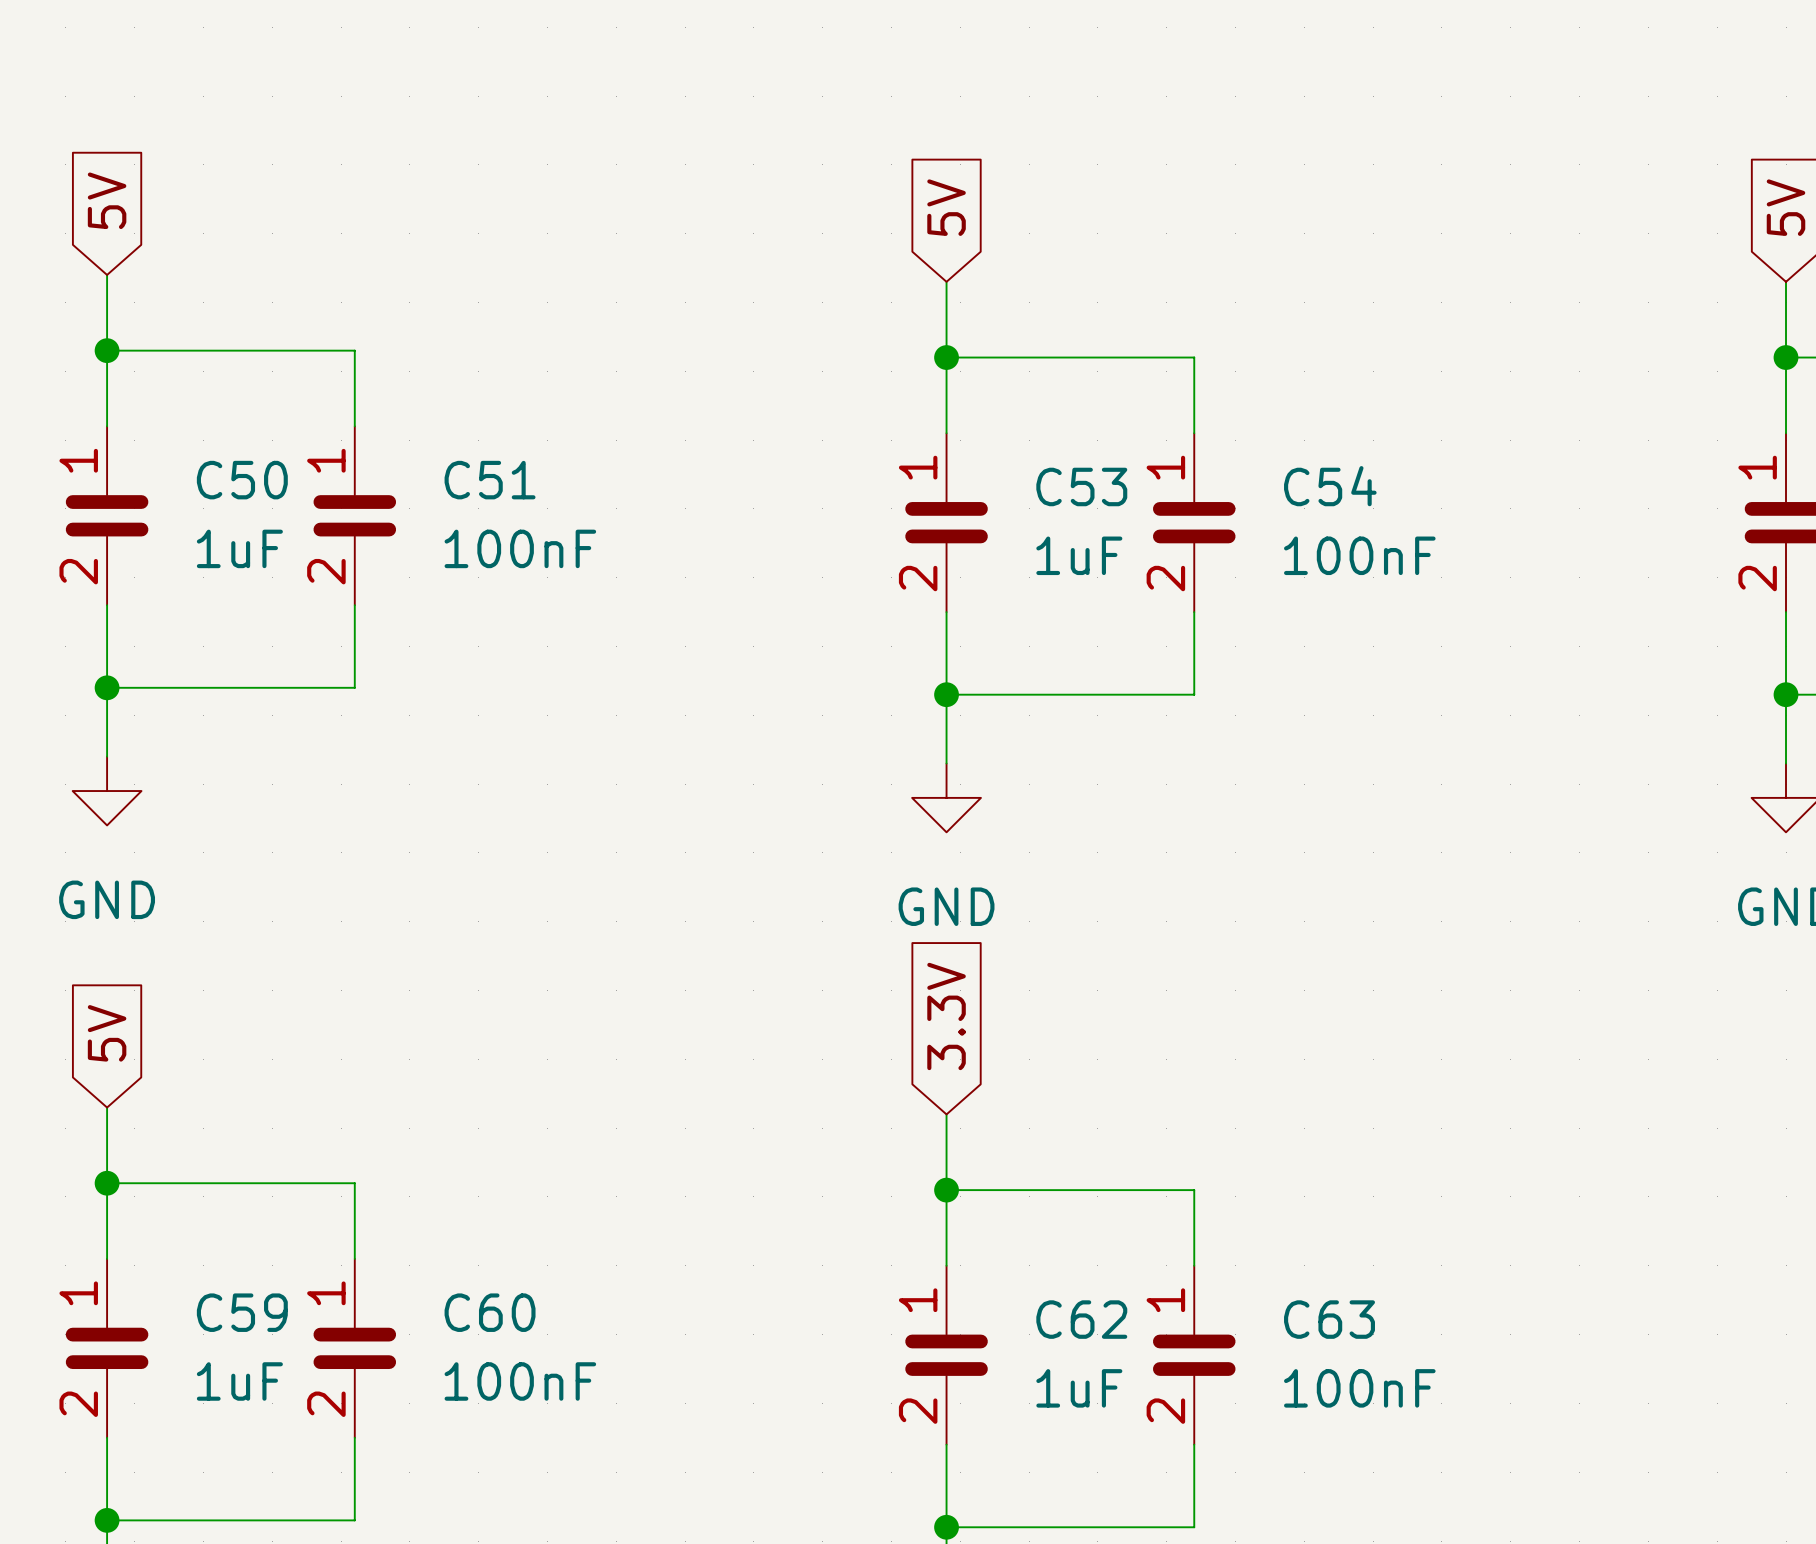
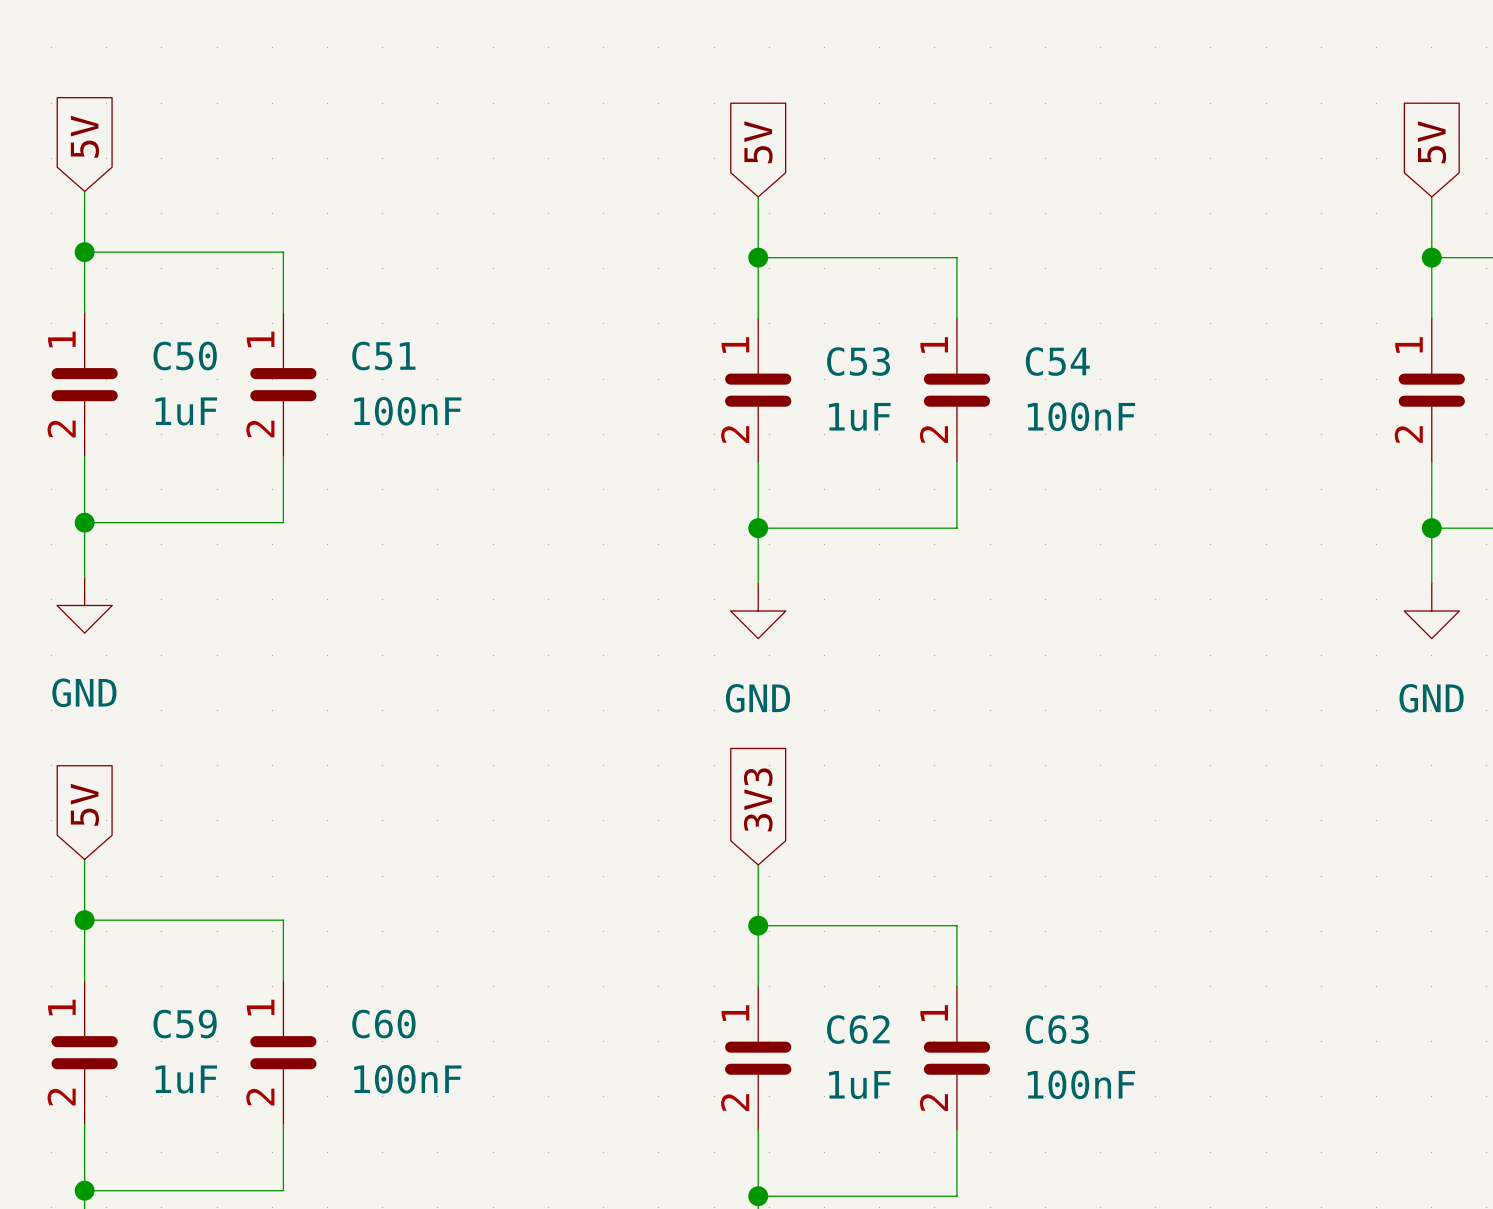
global label: 3.3V (946, 1016) -> 3V3 (758, 799)

